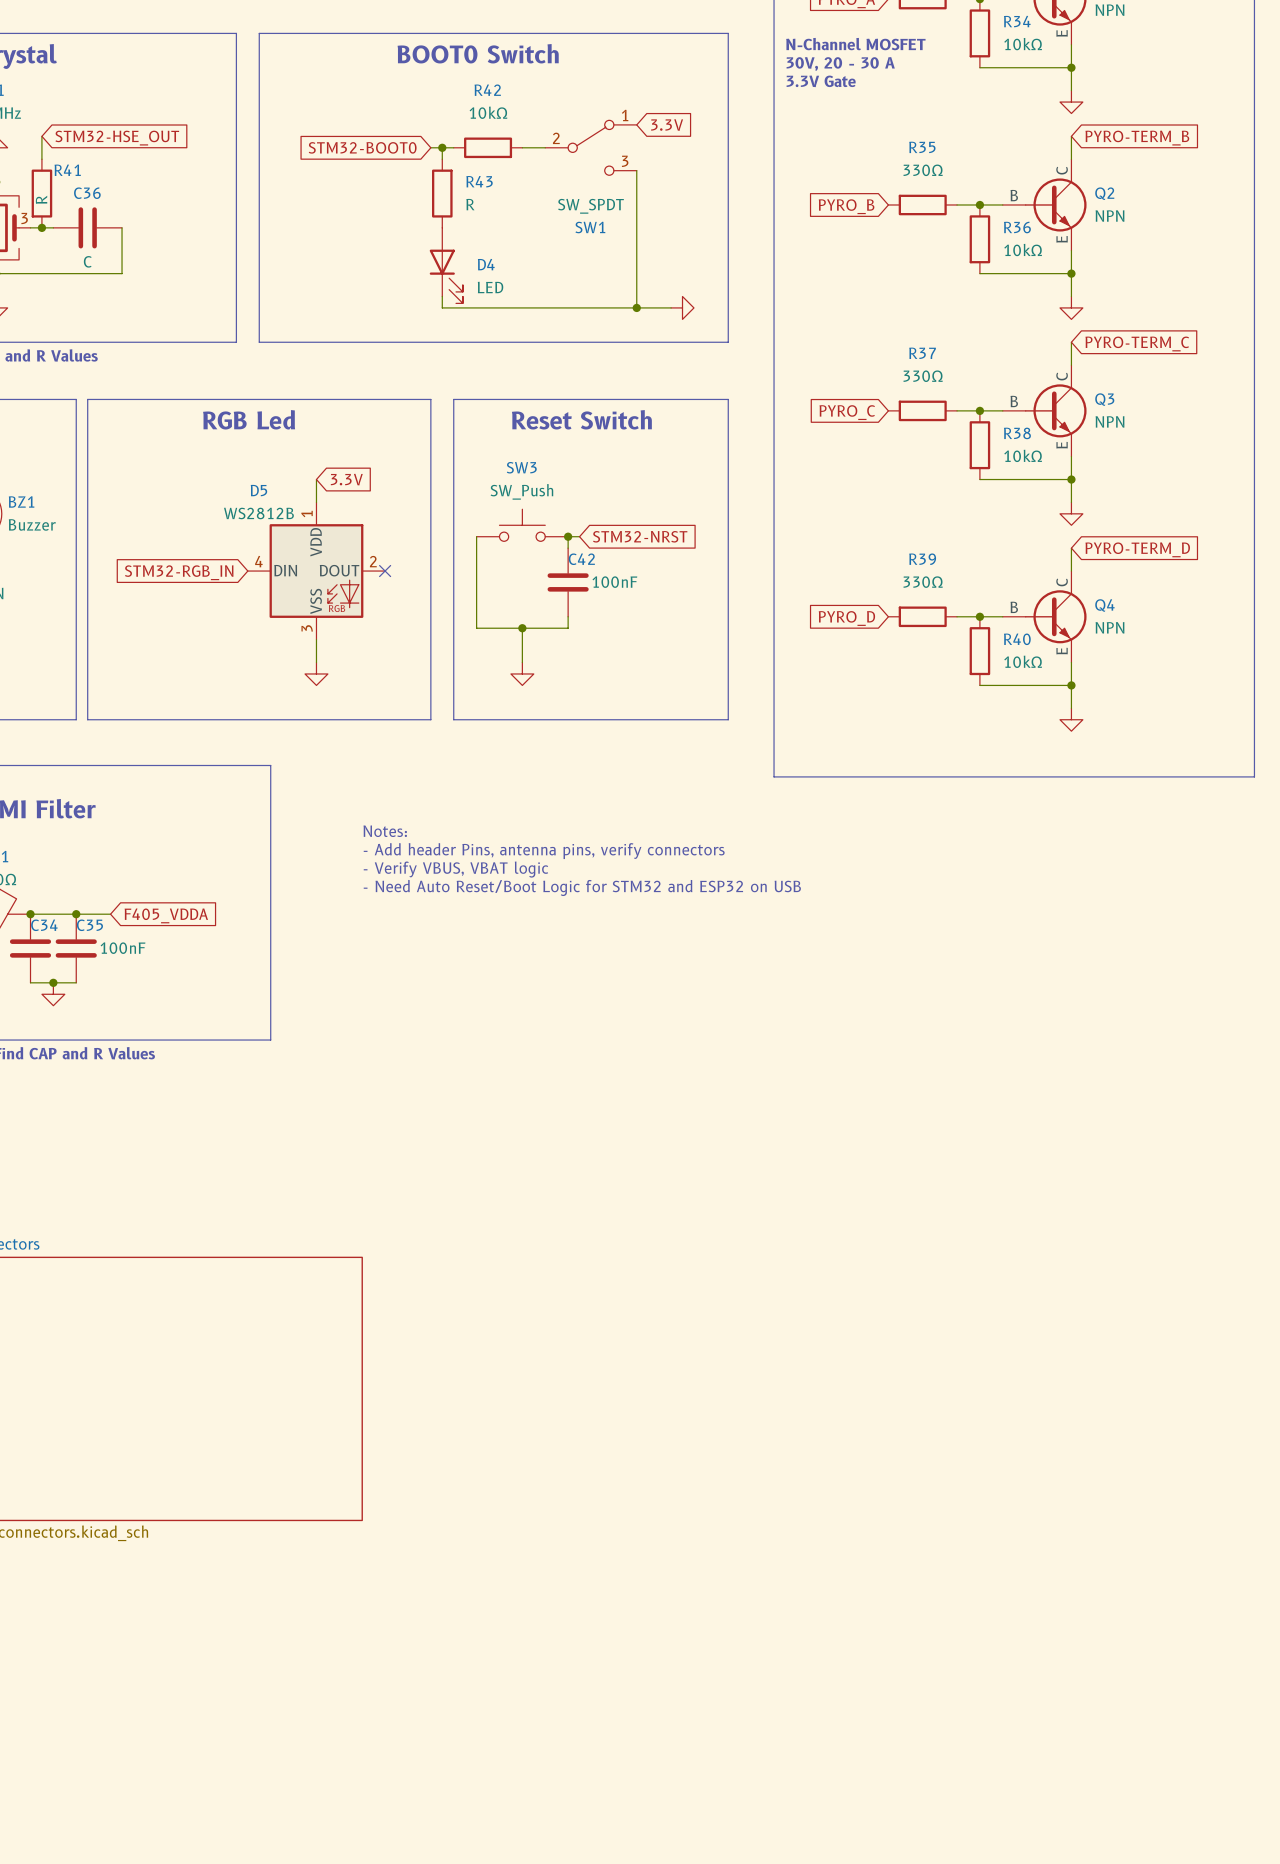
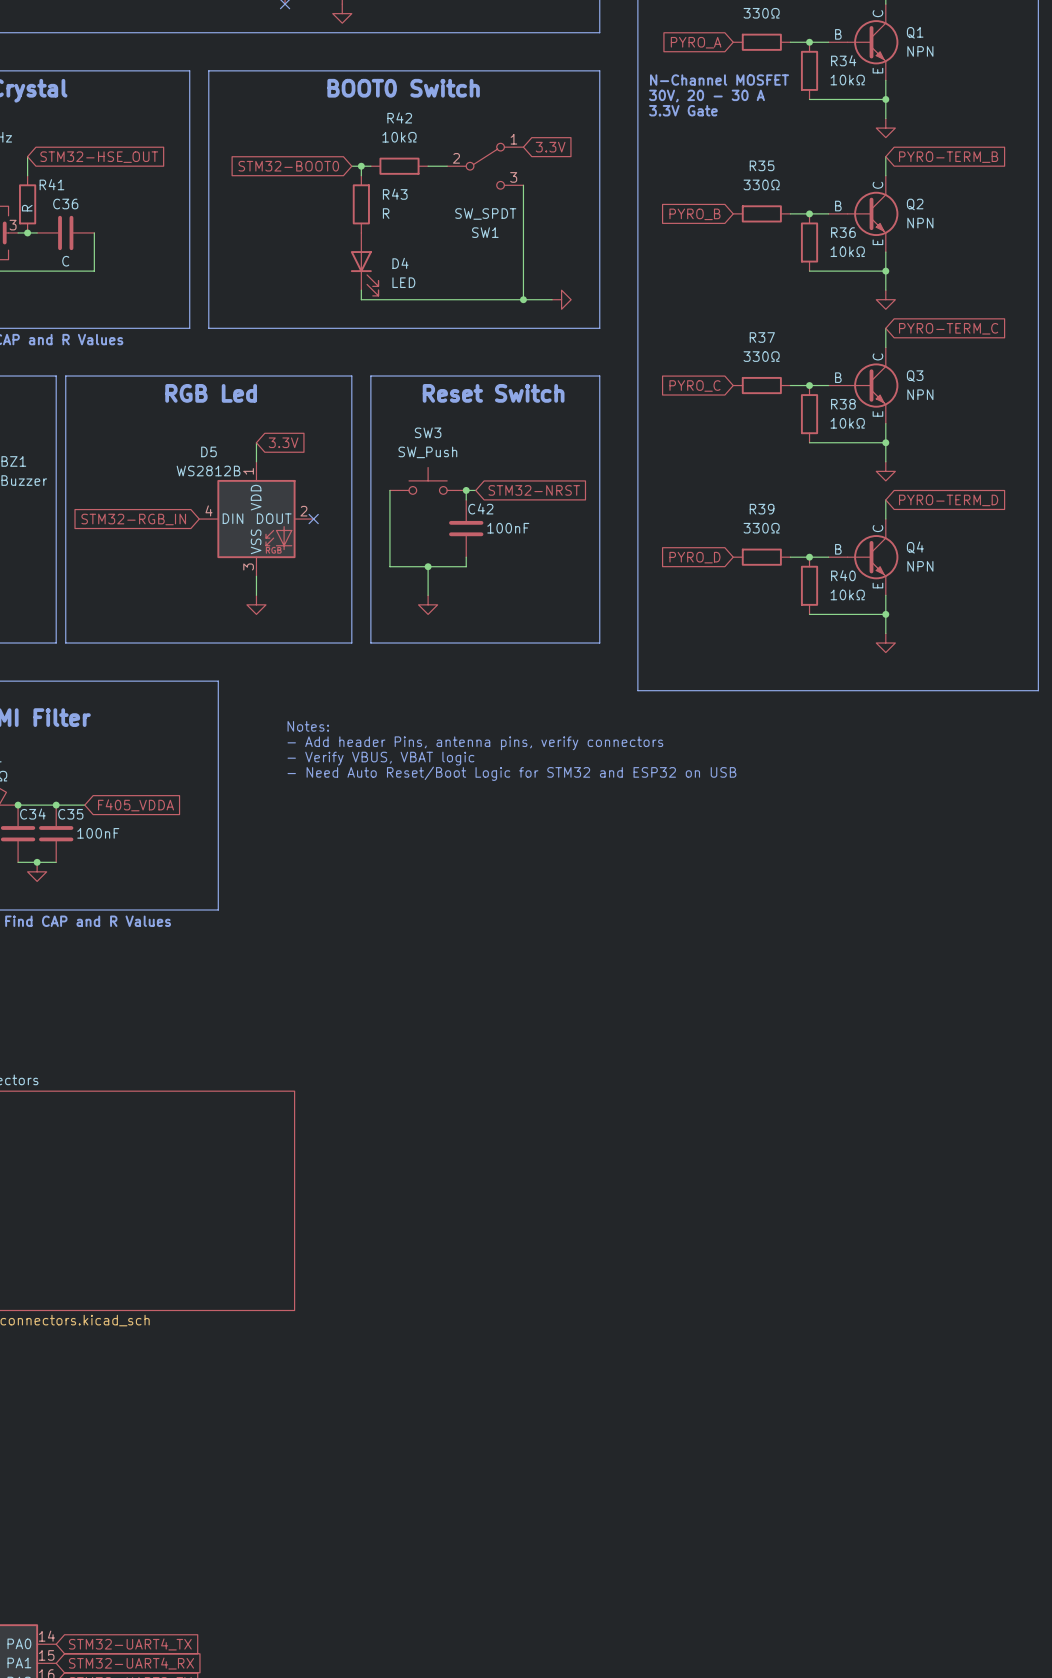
text position: Notes: (385, 831) -> Notes: (308, 726)
text position: - Add header Pins, antenna pins, verify connectors (544, 851) -> - Add header Pins, antenna pins, verify connectors (475, 743)
text position: - Verify VBUS, VBAT logic (455, 869) -> - Verify VBUS, VBAT logic (380, 758)
text position: - Need Auto Reset/Boot Logic for STM32 and ESP32 on USB (582, 887) -> - Need Auto Reset/Boot Logic for STM32 and ESP32 on USB (511, 773)

